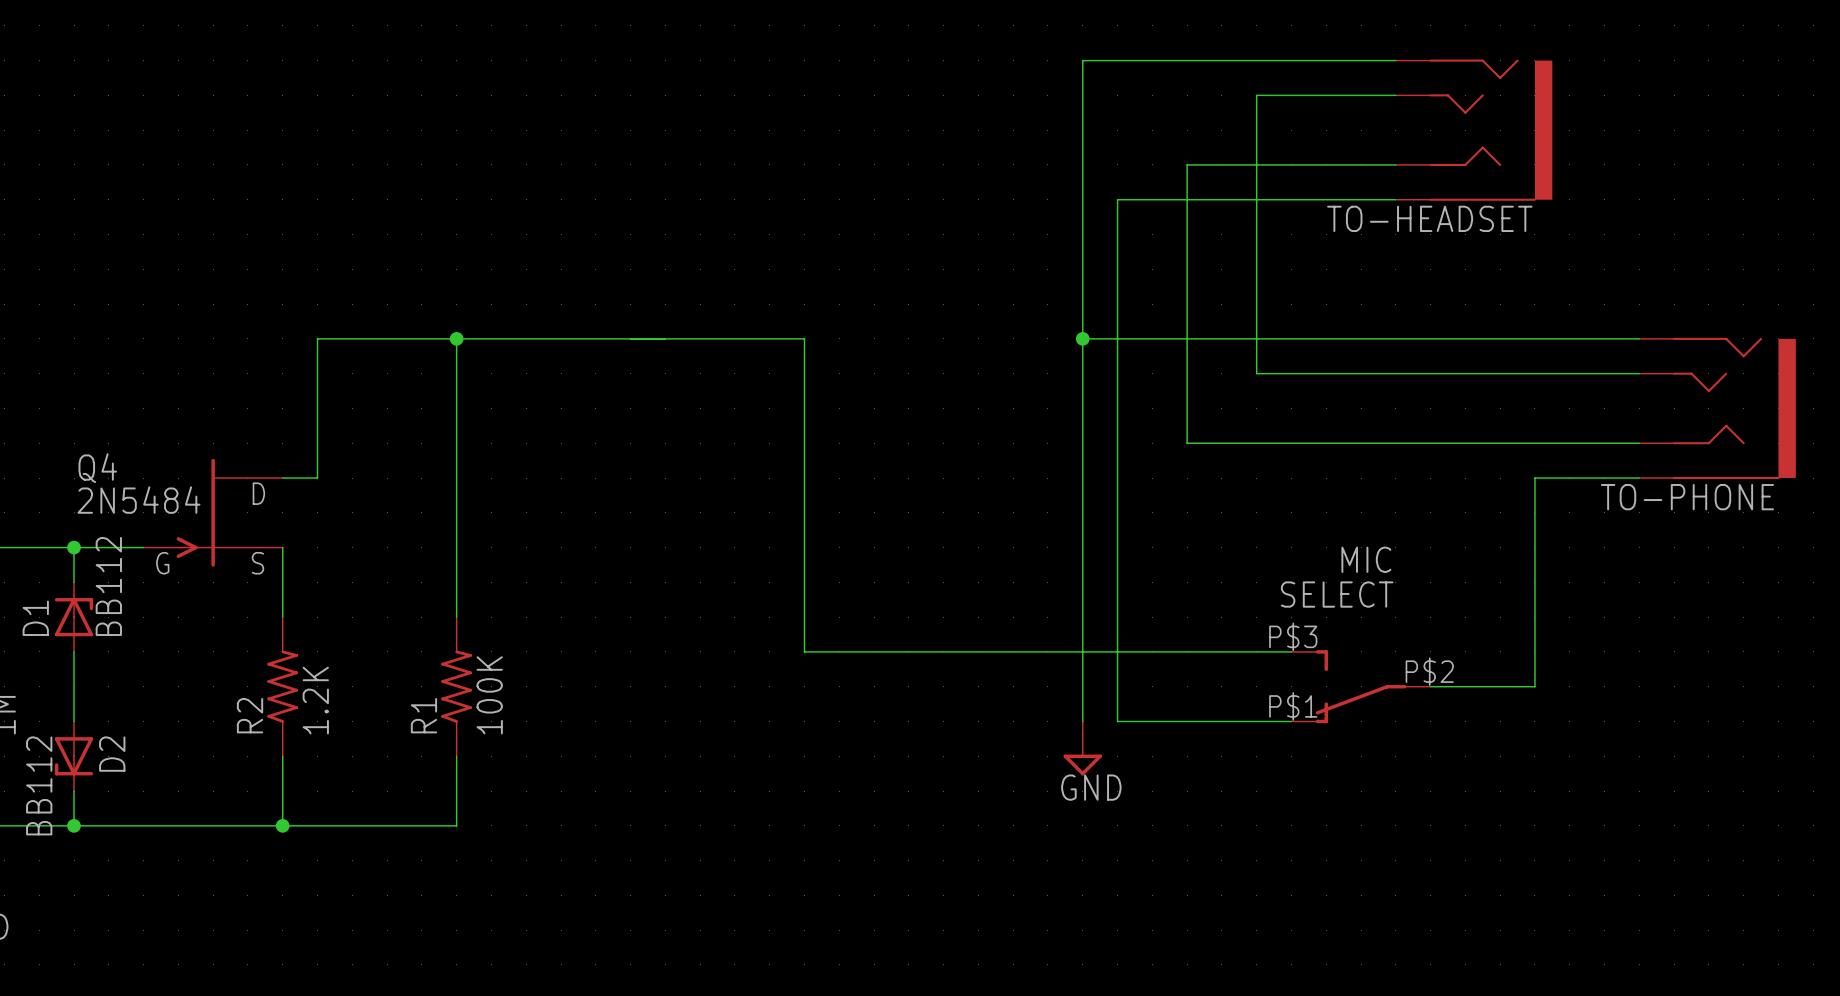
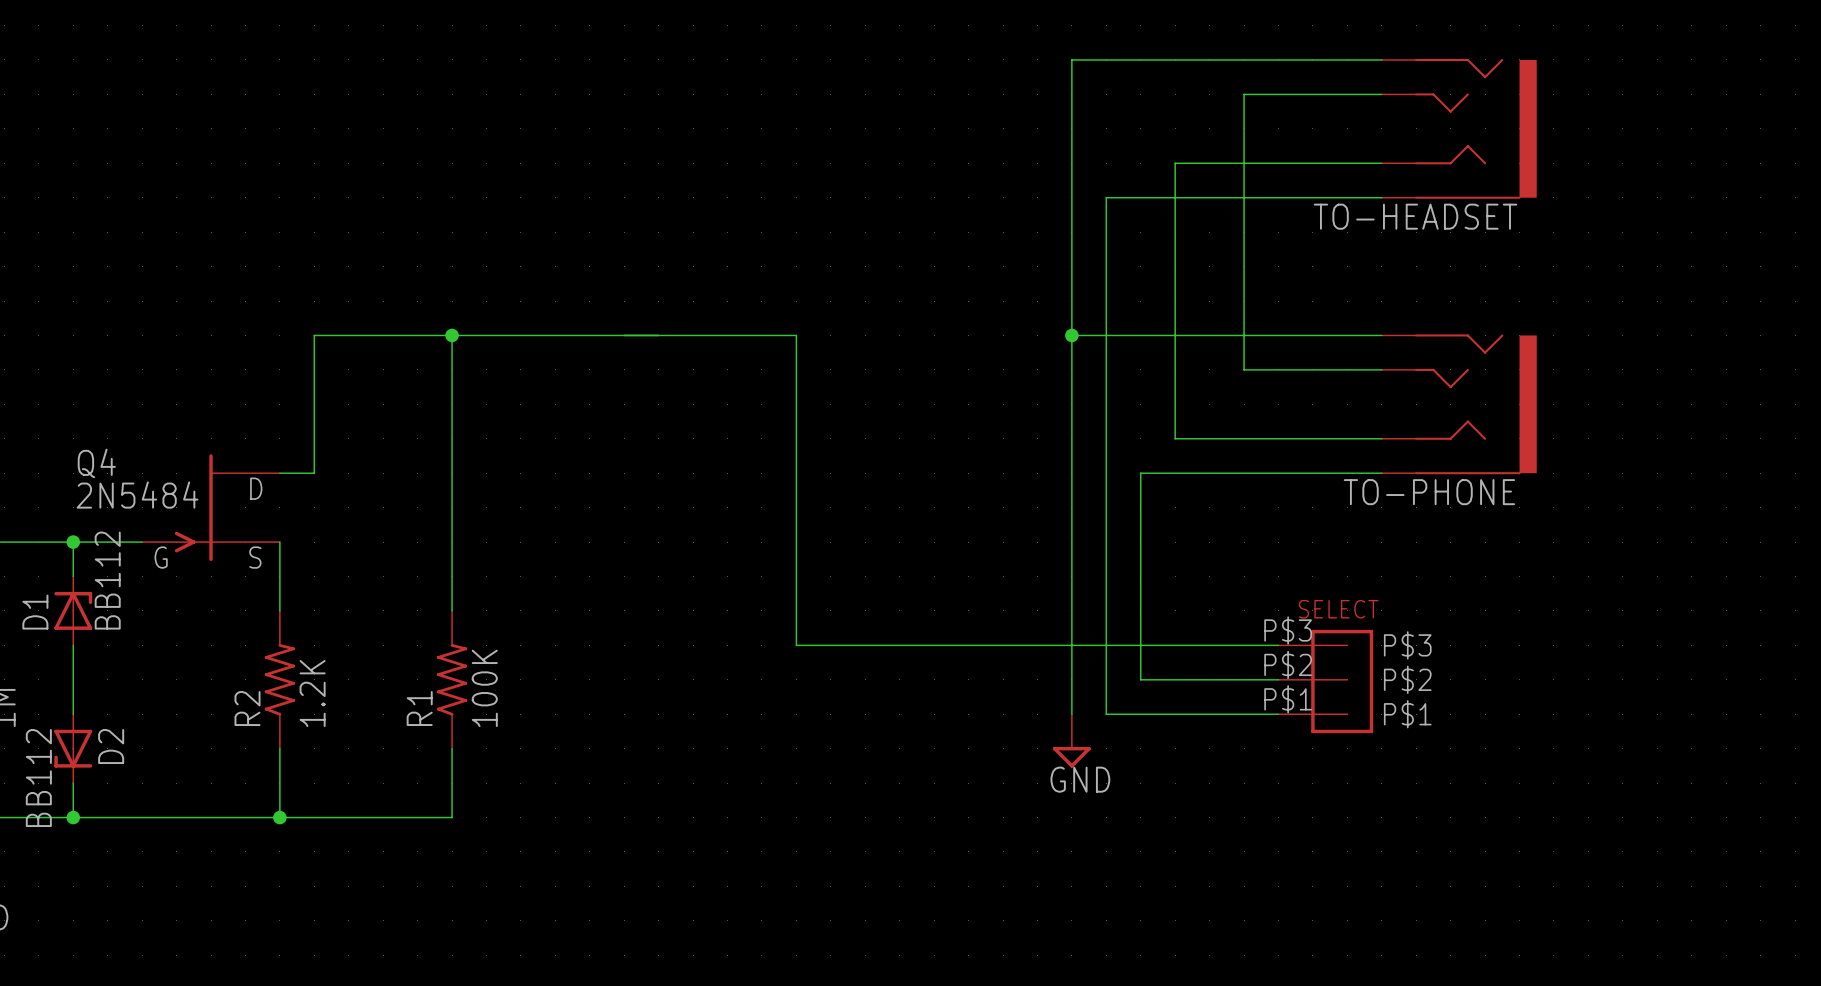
wire: (1395, 338) (1639, 338) -> none
wire: (1395, 373) (1639, 373) -> none
TO-PHONE position: (1717, 408) -> (1459, 404)
wire: (1395, 443) (1639, 443) -> none
wire: none -> (1381, 473) (1140, 473) (1140, 679) (1278, 679)
wire: (1639, 478) (1534, 478) (1534, 686) (1430, 686) -> none
SELECT: MIC (1361, 686) -> none
SELECT: none -> (1325, 681)

